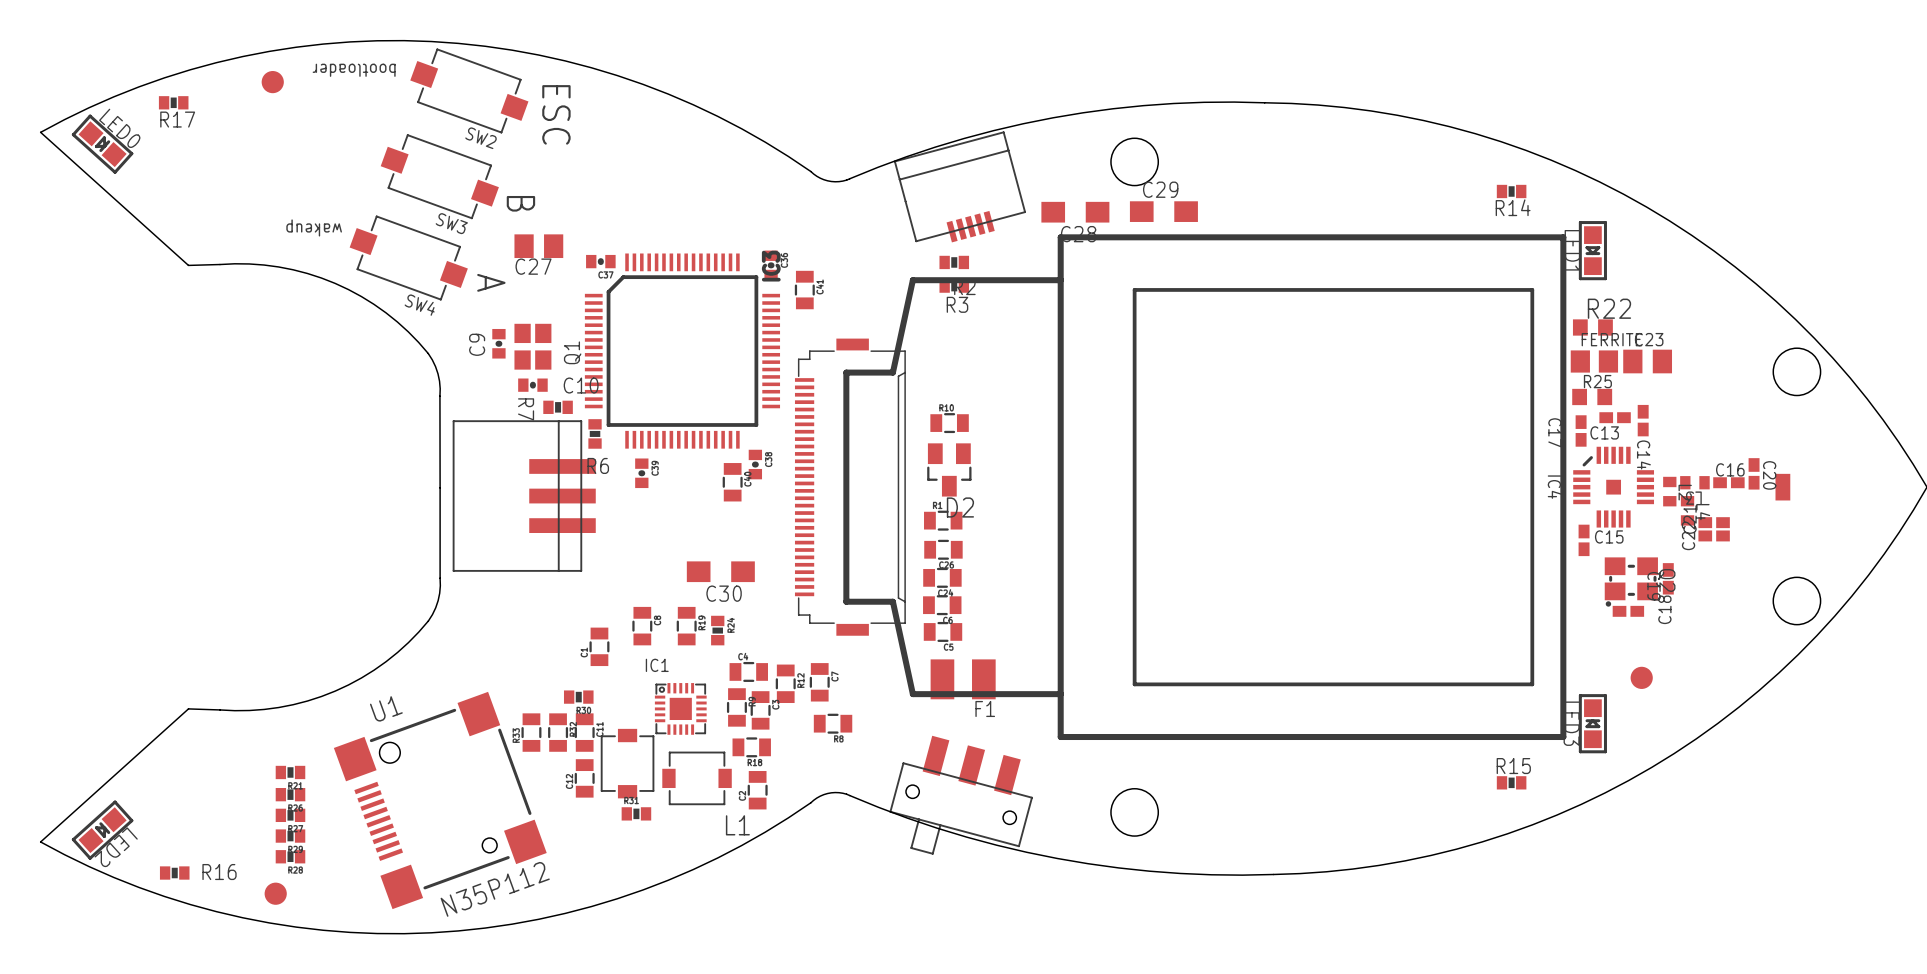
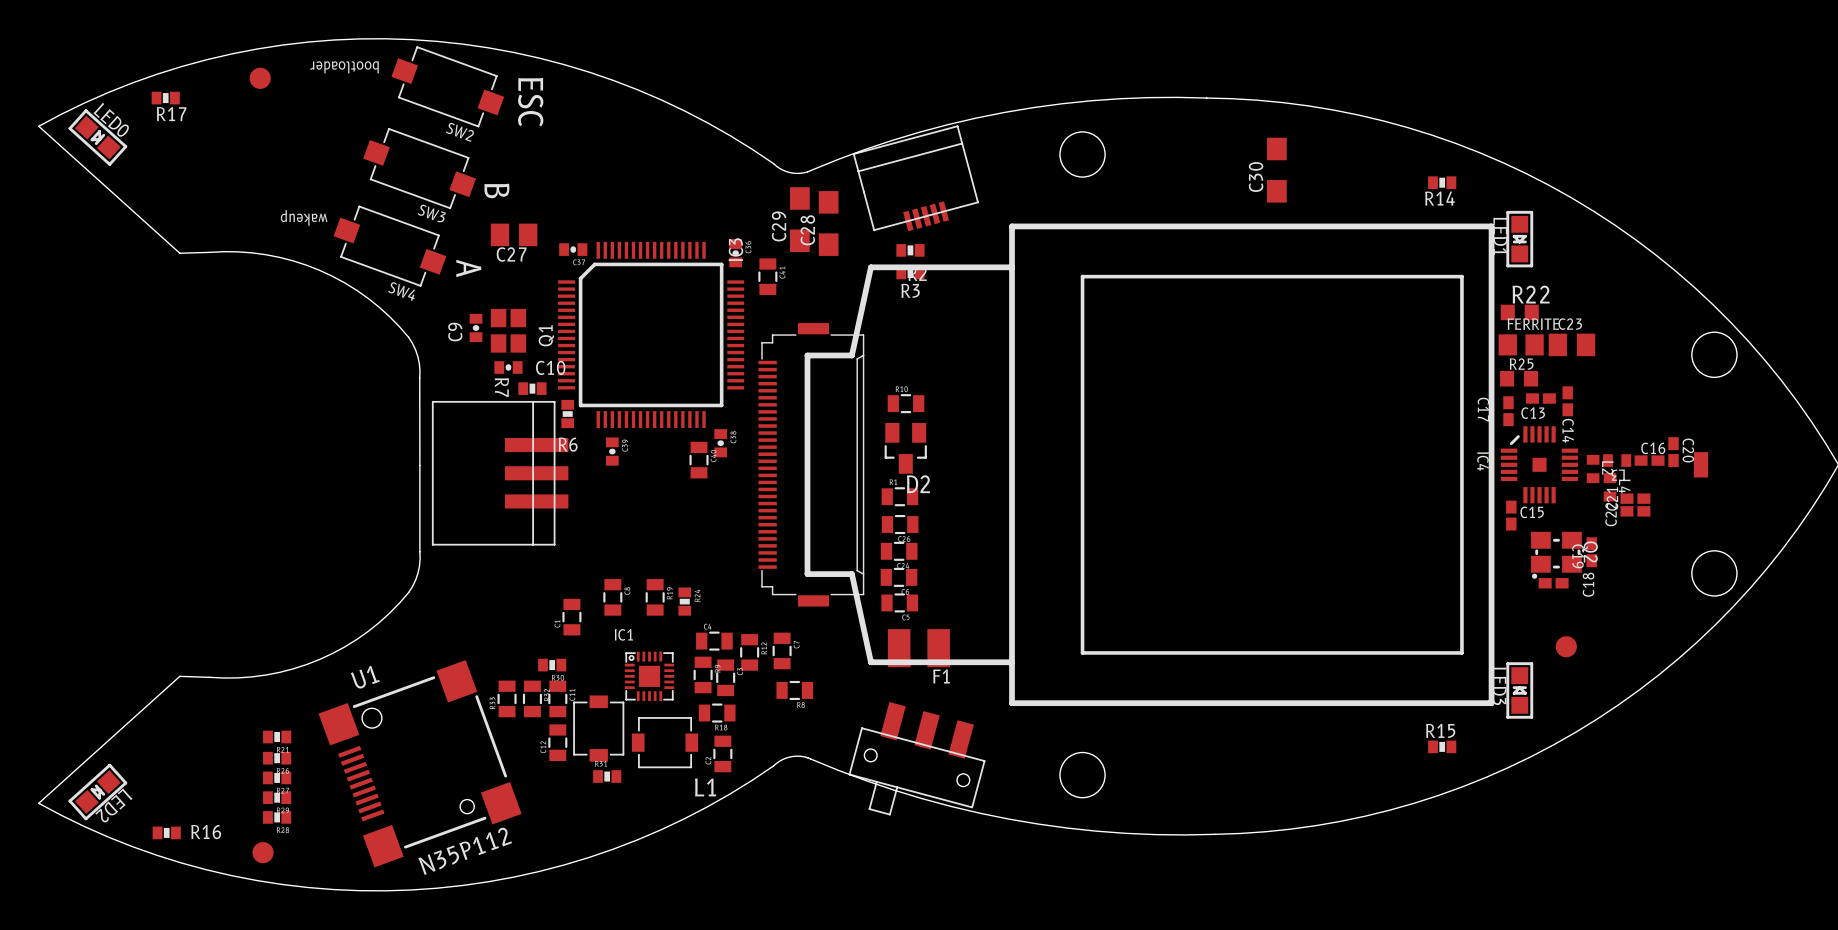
C29 name position: C29 (1160, 189) -> C29 (779, 226)
C29 rotation: 0° (1163, 211) -> 90° clockwise (799, 219)
C29 position: (1163, 211) -> (799, 219)
C28 rotation: 0° (1075, 212) -> 90° clockwise (828, 223)
C28 position: (1075, 212) -> (828, 223)
C30 rotation: 0° (720, 571) -> 90° clockwise (1276, 170)
C30 position: (720, 571) -> (1276, 170)

